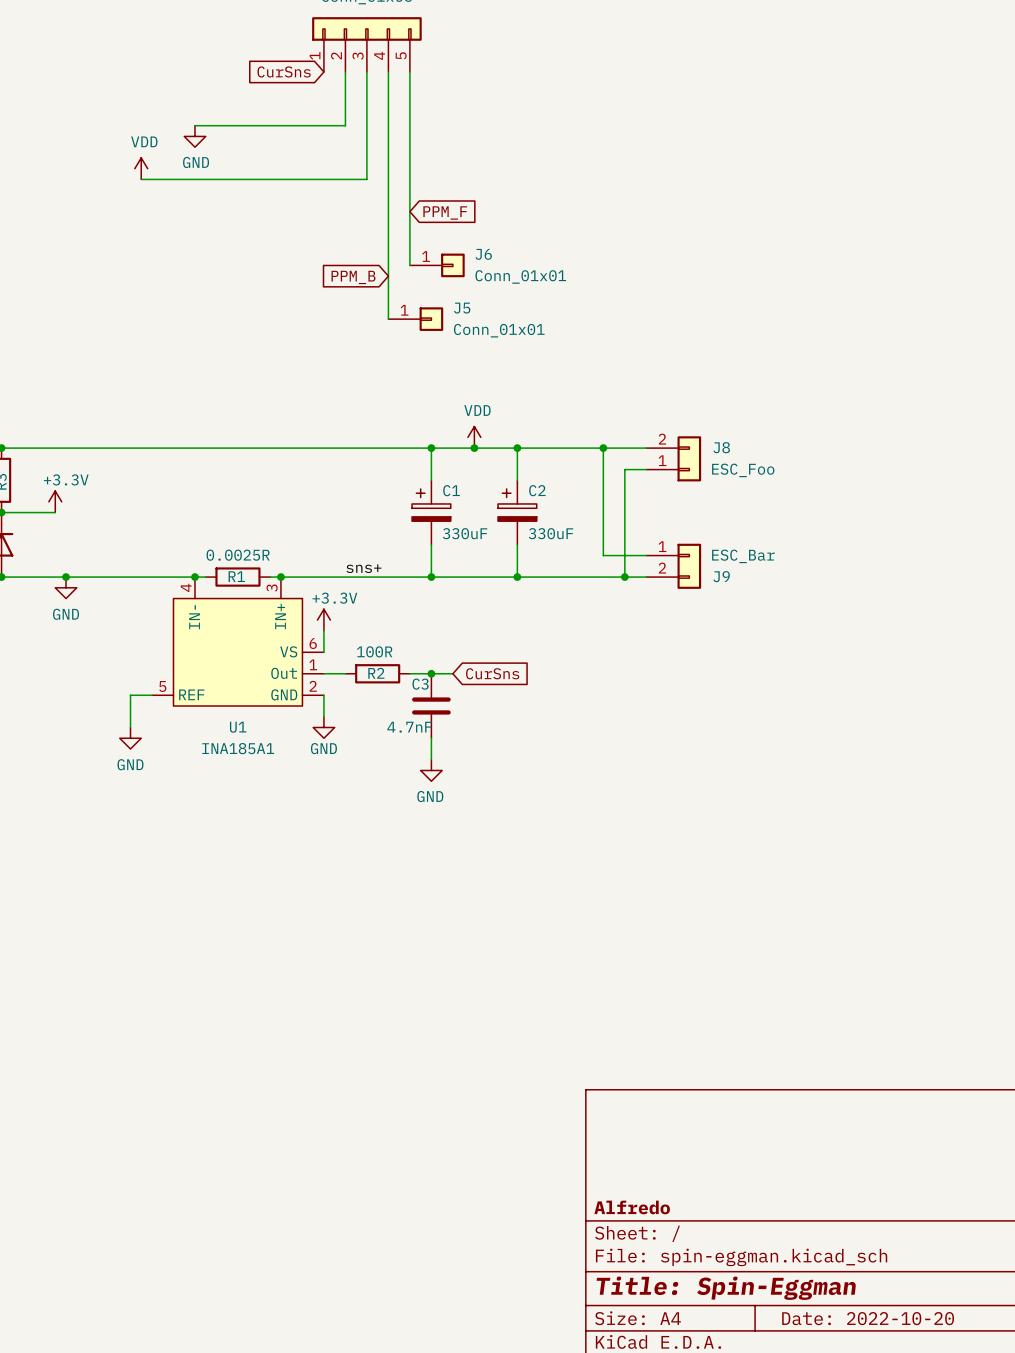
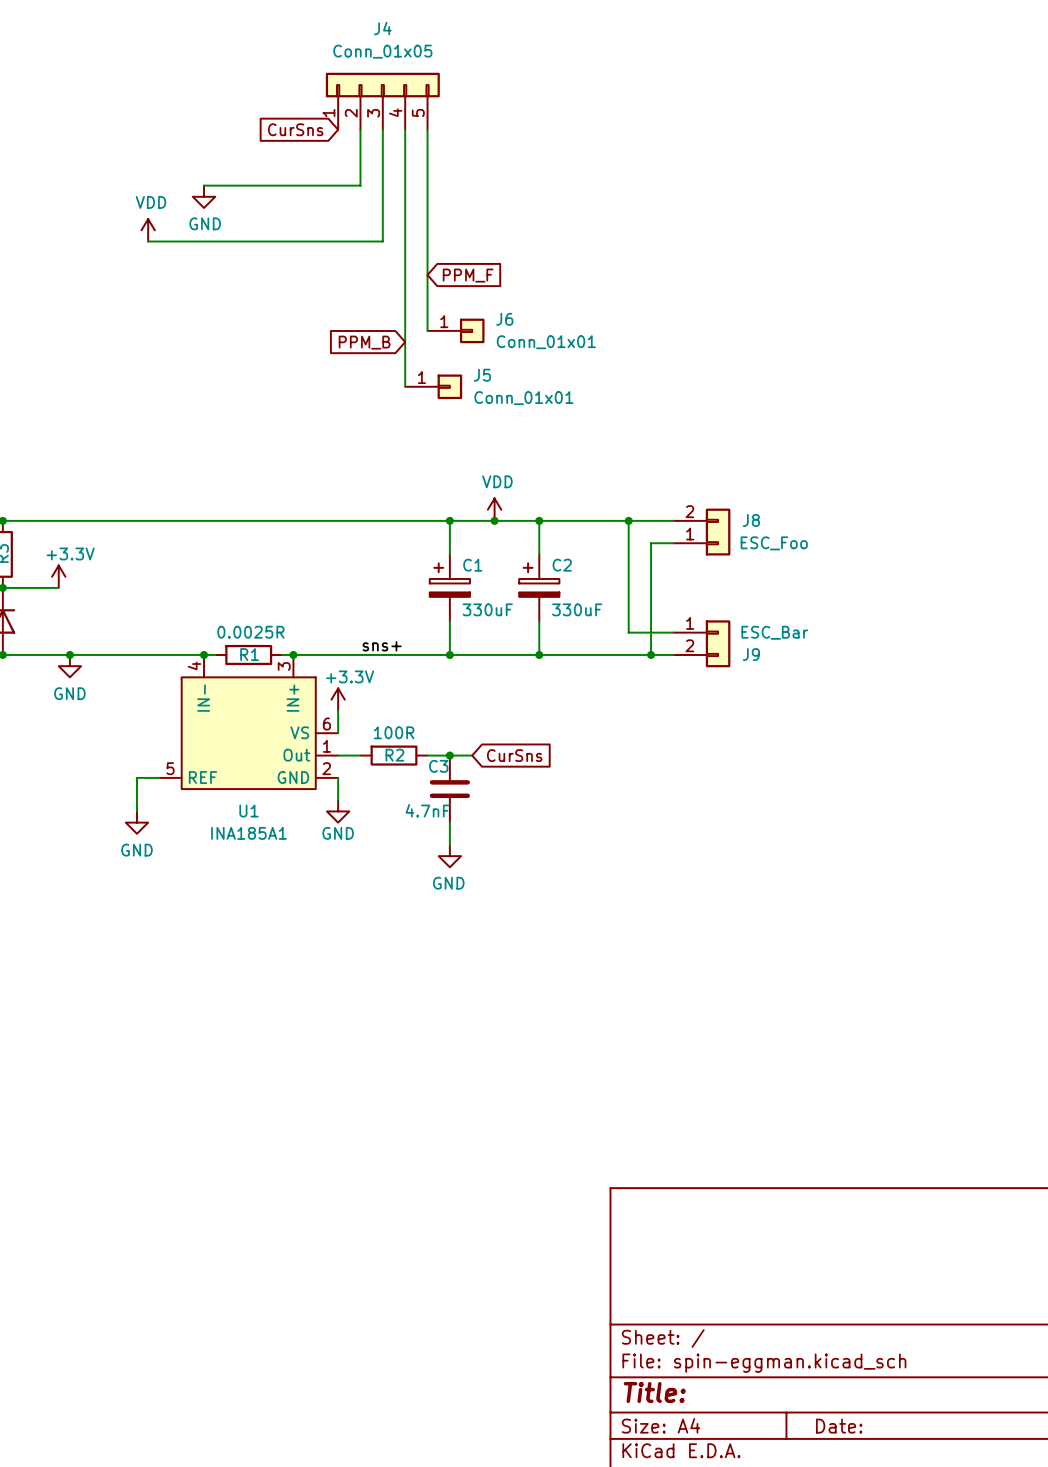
title block: Alfredo (632, 1207) -> none
title block: Title: Spin-Eggman (726, 1288) -> Title: (654, 1392)
title block: Date: 2022-10-20 (868, 1318) -> Date: (839, 1426)

